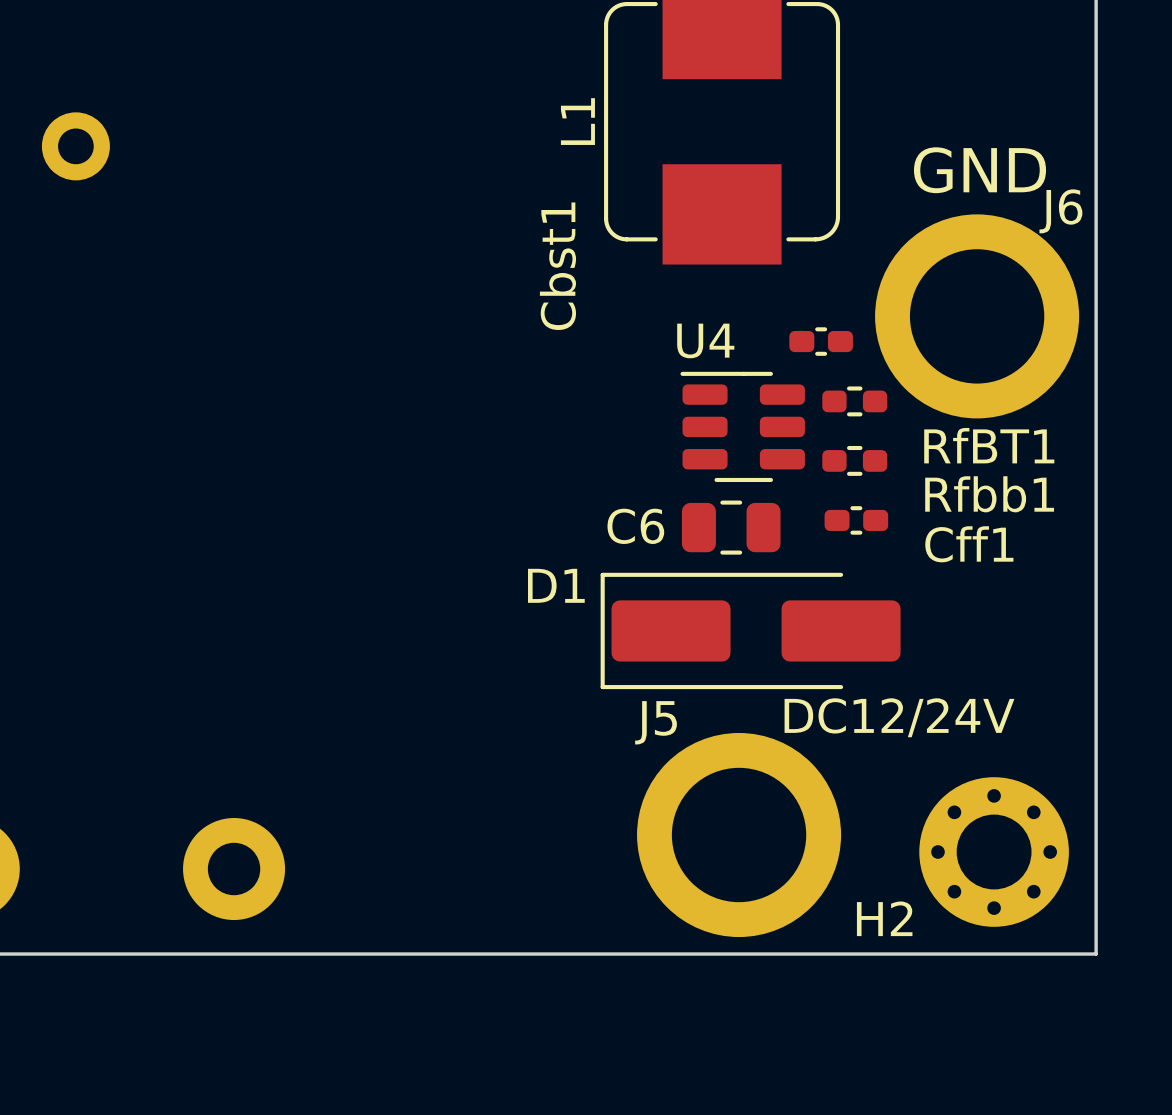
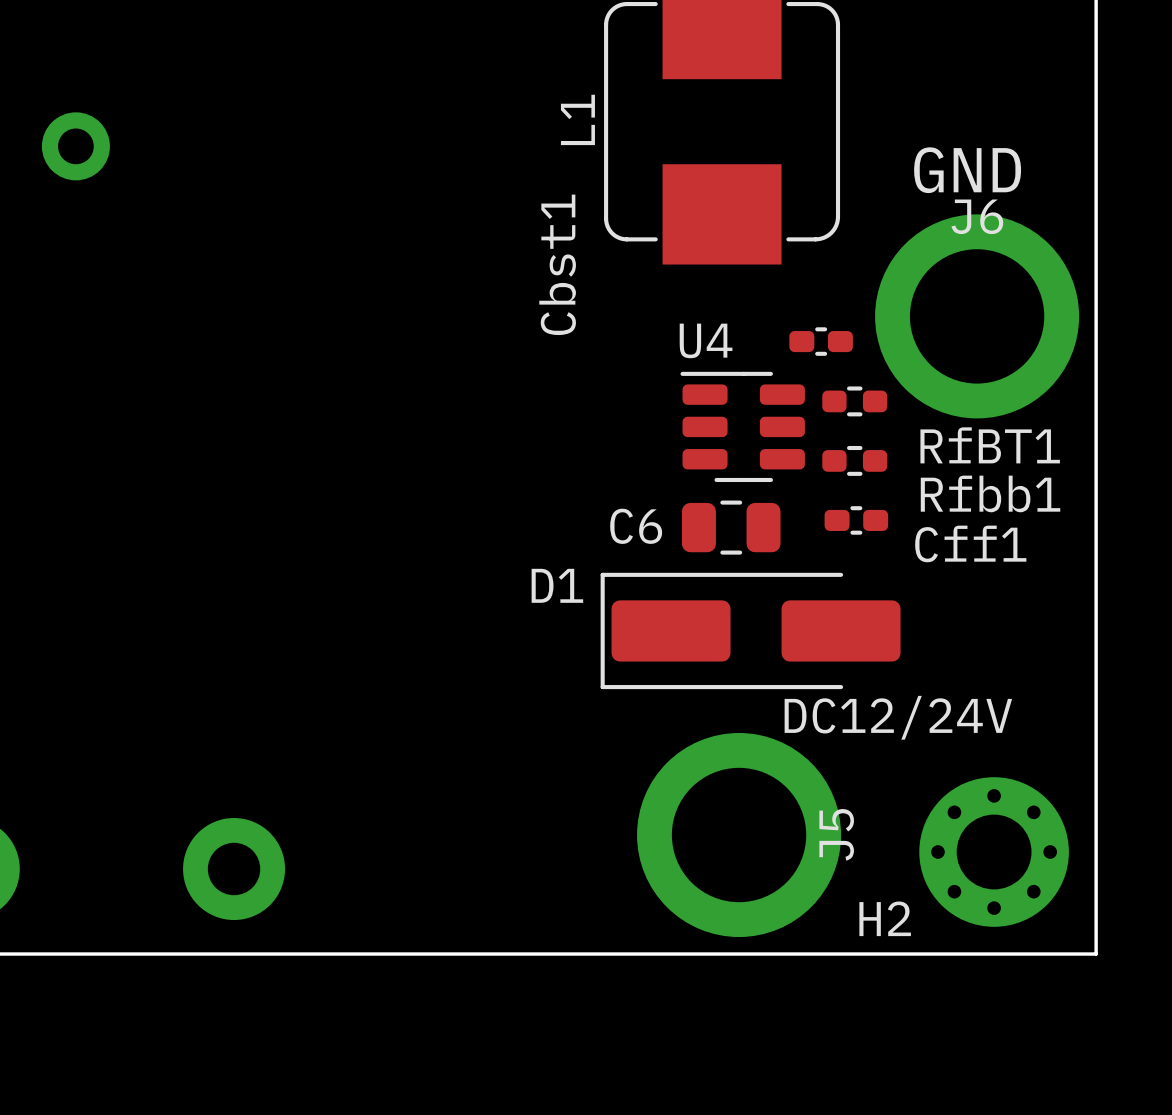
J6 name position: J6 (1060, 211) -> J6 (977, 216)
J5 name rotation: 0° (656, 722) -> 90° counterclockwise (836, 834)
J5 name position: J5 (656, 722) -> J5 (836, 834)

